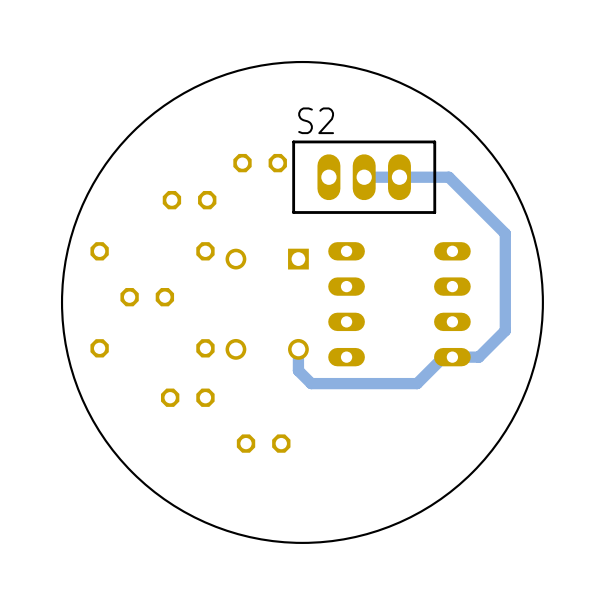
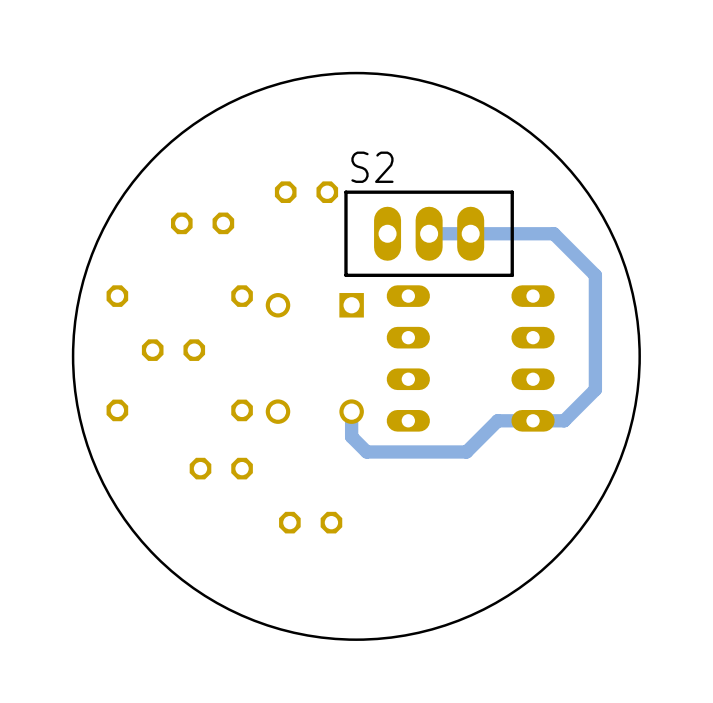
track: (364, 177) (448, 177) (470, 198) -> (429, 233) (553, 233)
S2 position: (364, 177) -> (429, 233)
part position: (189, 200) -> (202, 223)
track: (443, 357) (417, 383) (395, 383) -> (522, 420) (497, 420) (466, 451)

